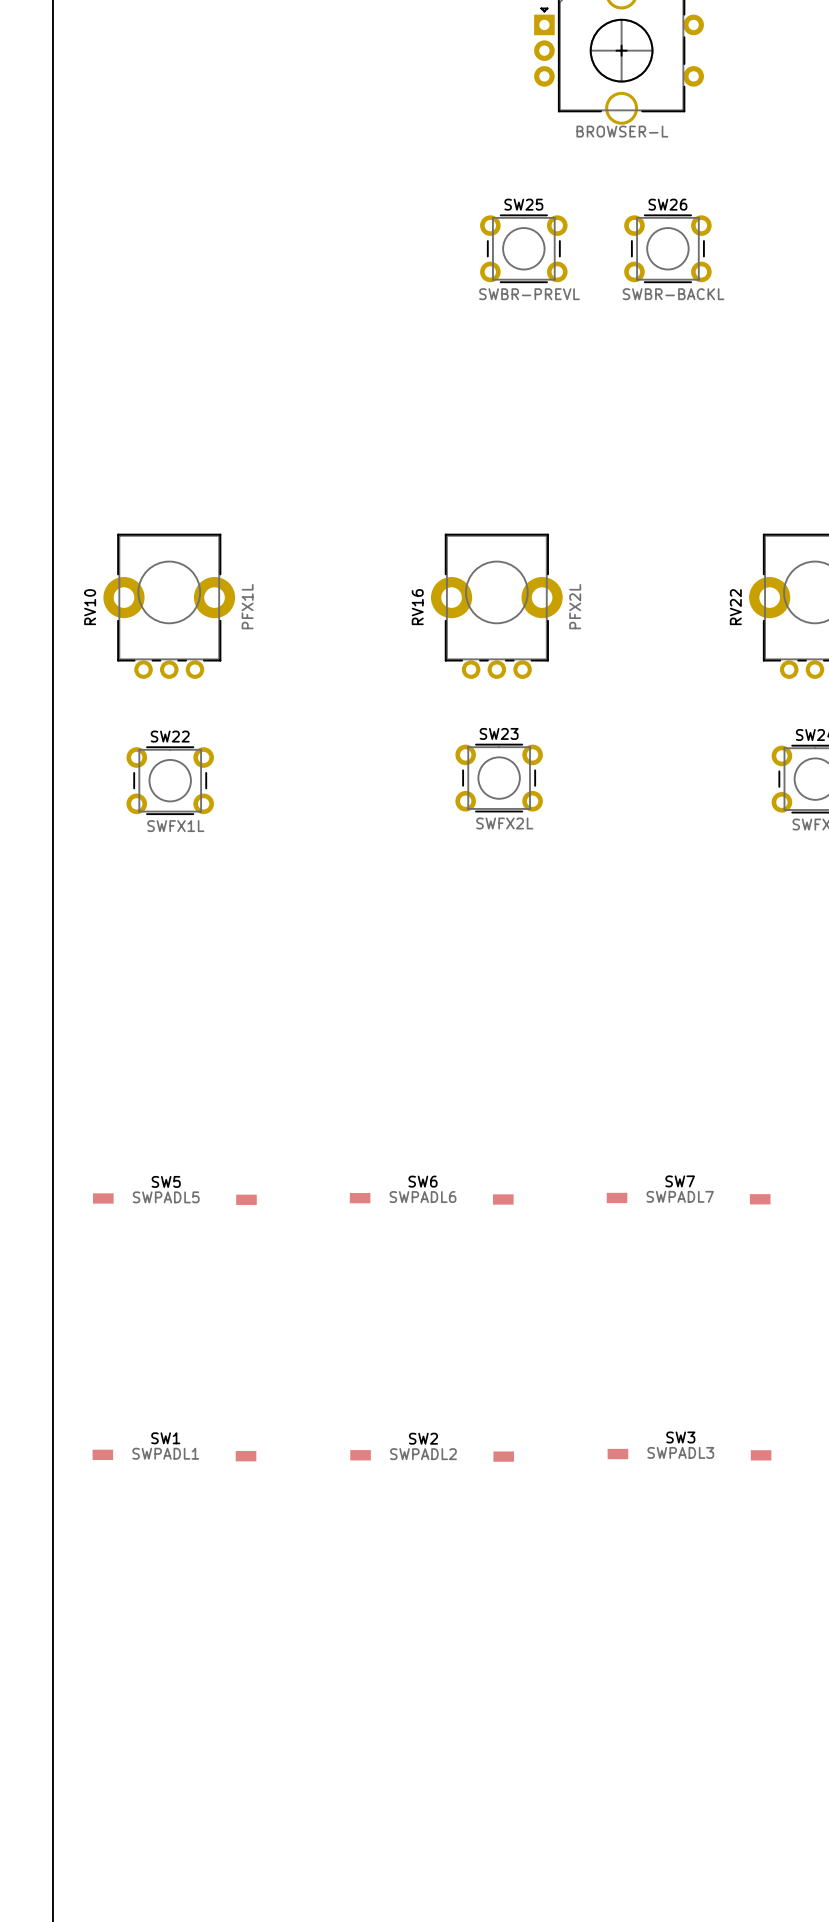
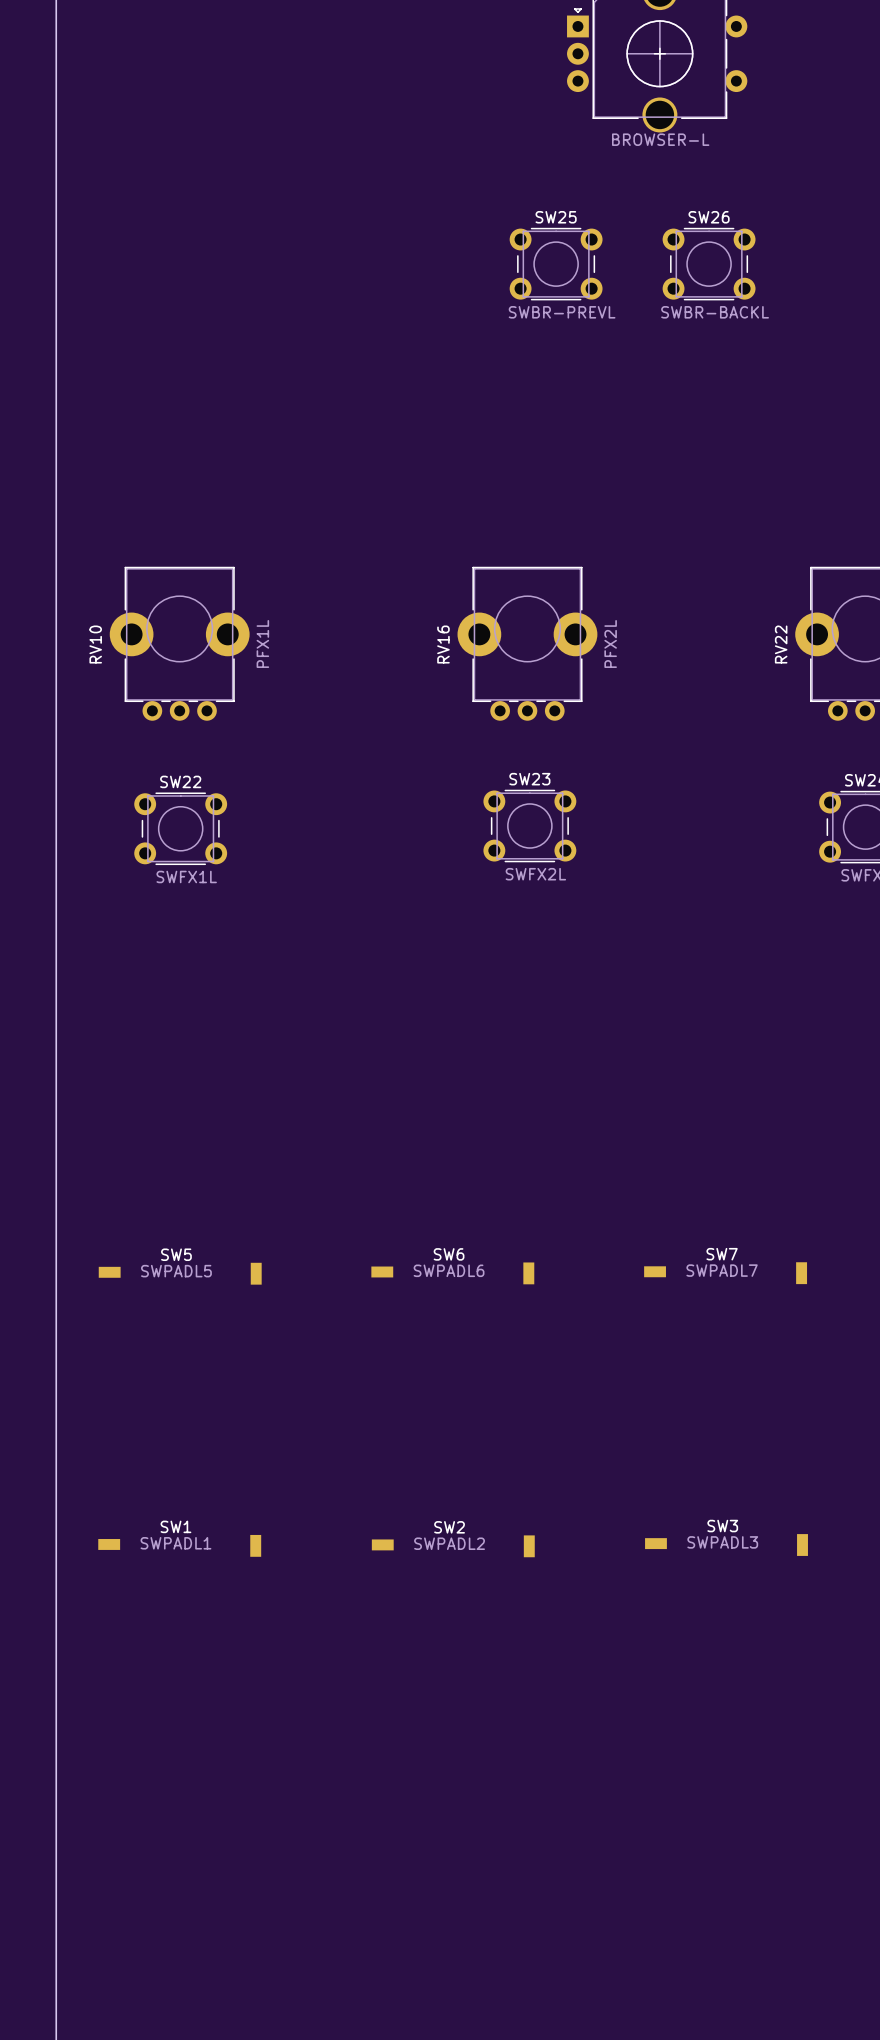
SW7 footprint: [606, 1192, 771, 1205] -> [644, 1262, 808, 1285]
SW5 footprint: [93, 1193, 257, 1205] -> [98, 1262, 262, 1285]
SW6 footprint: [349, 1193, 514, 1205] -> [371, 1262, 535, 1285]
SW3 footprint: [607, 1448, 772, 1461] -> [645, 1534, 808, 1556]
SW1 footprint: [92, 1449, 257, 1462] -> [98, 1534, 262, 1557]
SW2 footprint: [350, 1450, 515, 1462] -> [371, 1535, 535, 1558]

